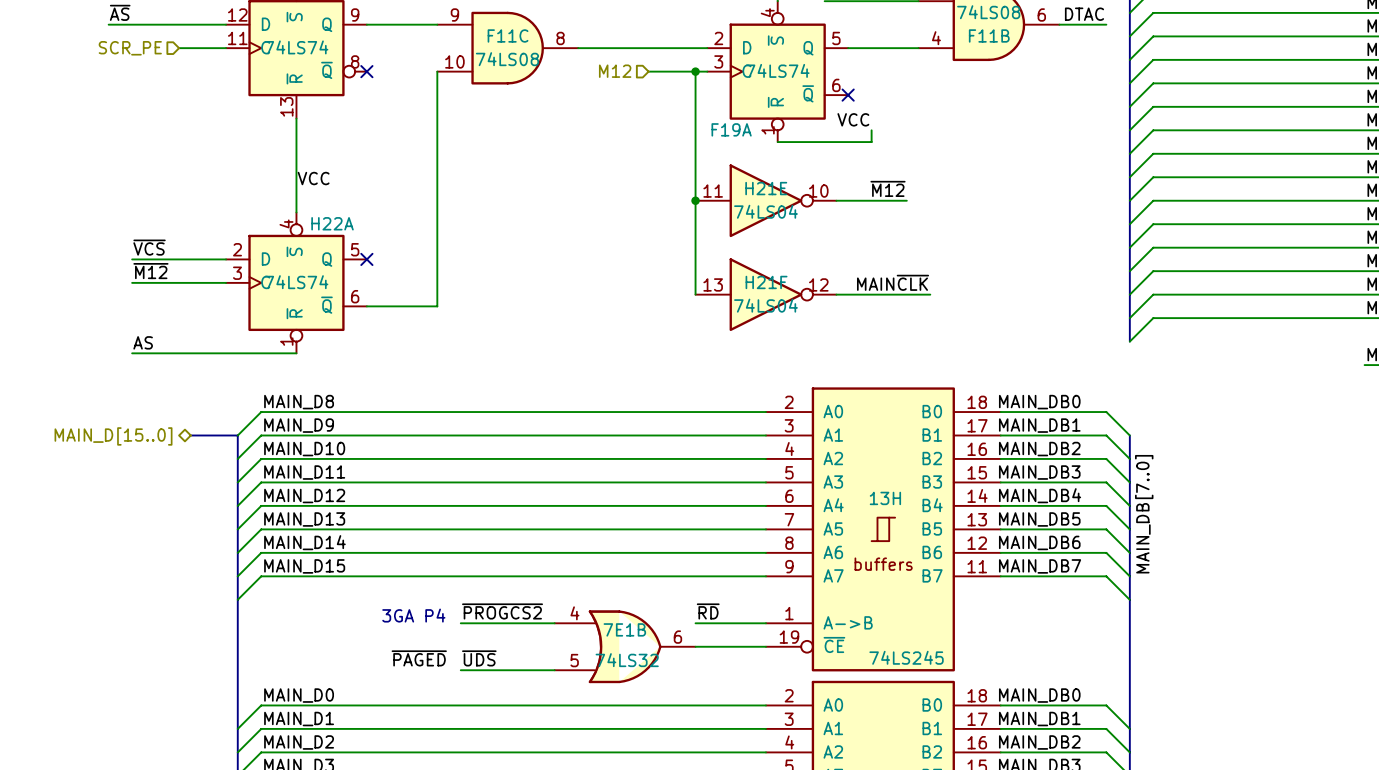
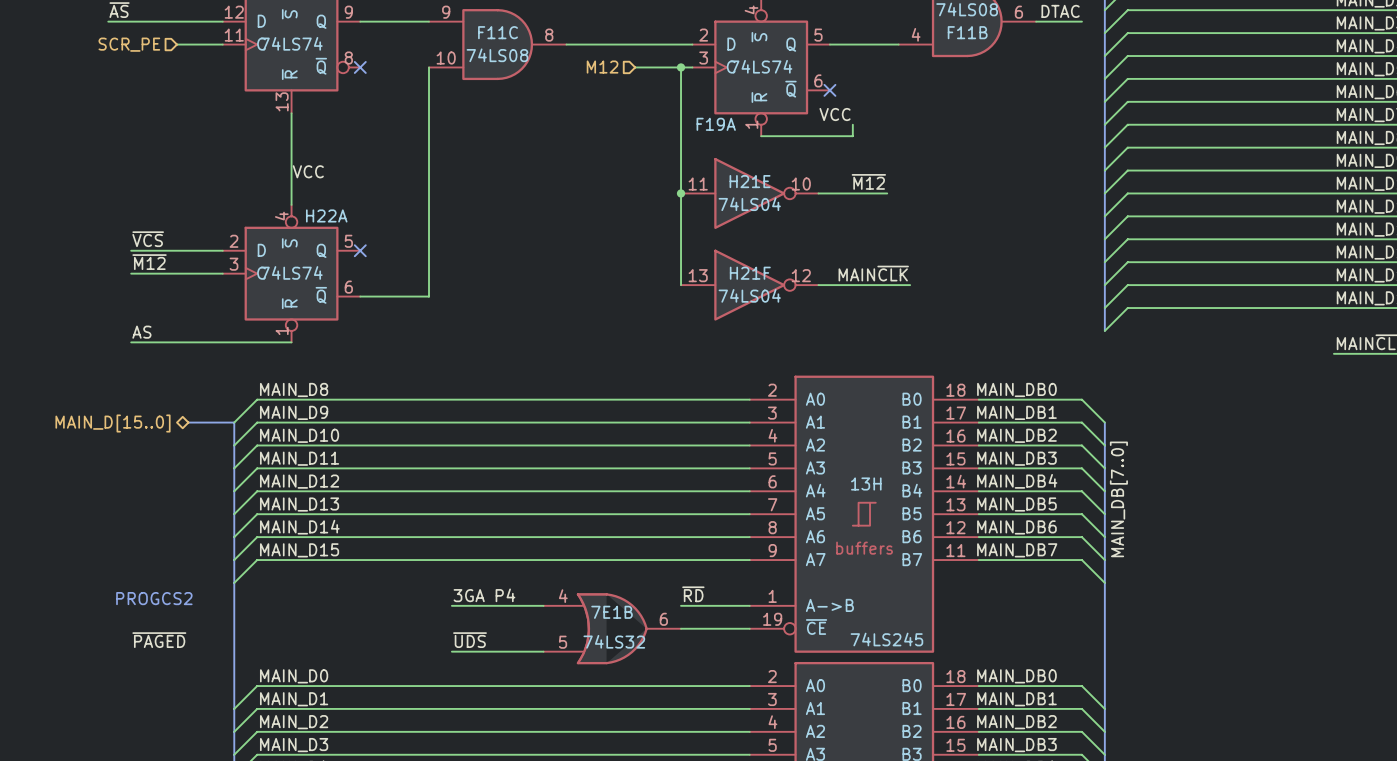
label: ~{PROGCS2} (502, 611) -> 3GA P4 (484, 595)
text: none -> PROGCS2 (154, 598)
text: 3GA P4 (413, 615) -> none
label: none -> ~{PAGED} (159, 640)
label: ~{PAGED} (419, 658) -> none

